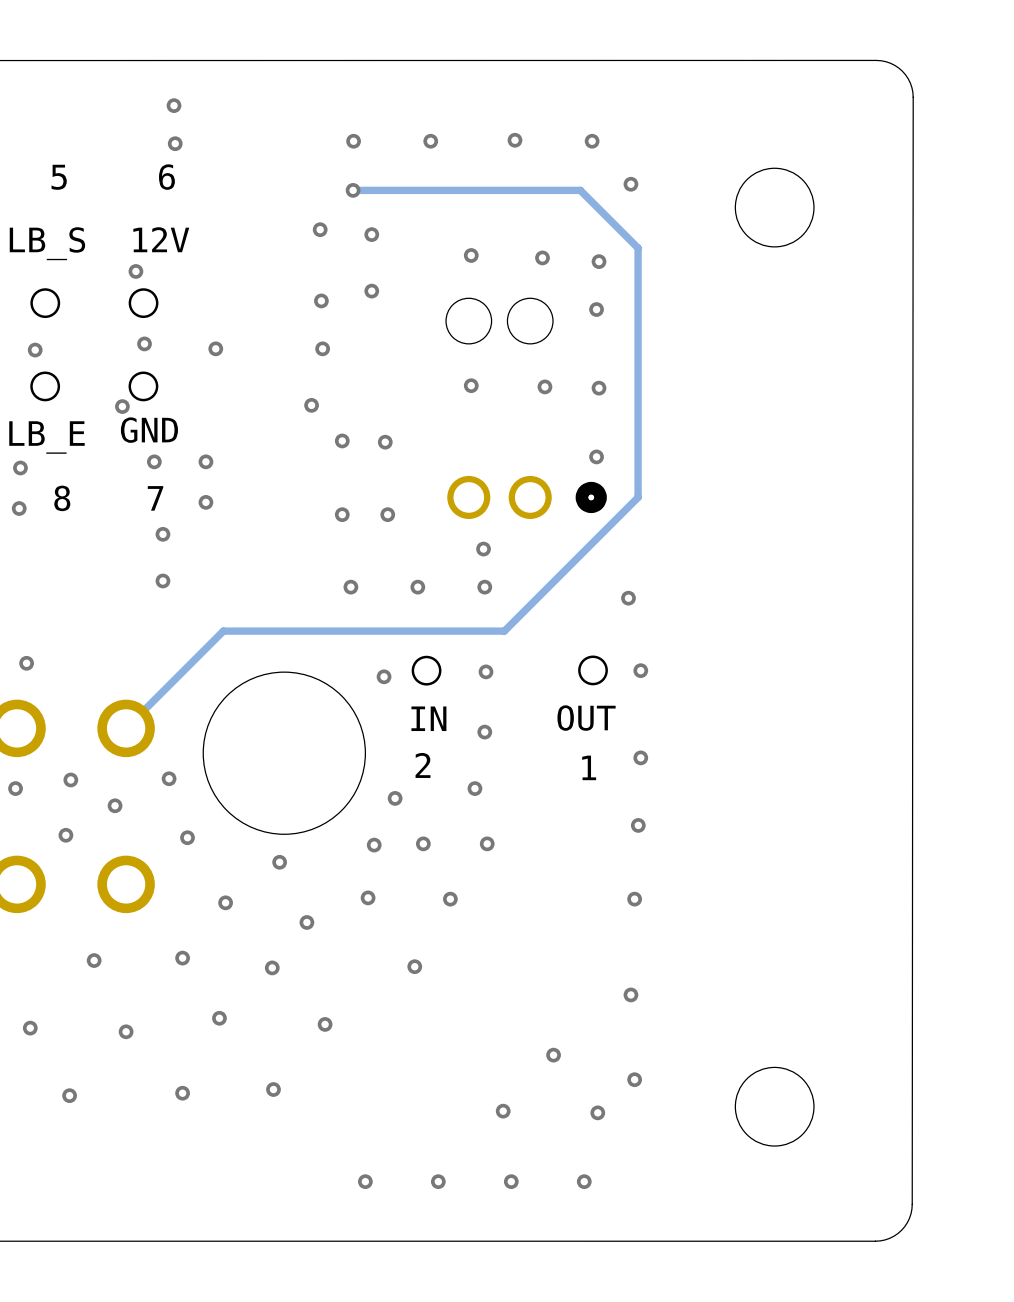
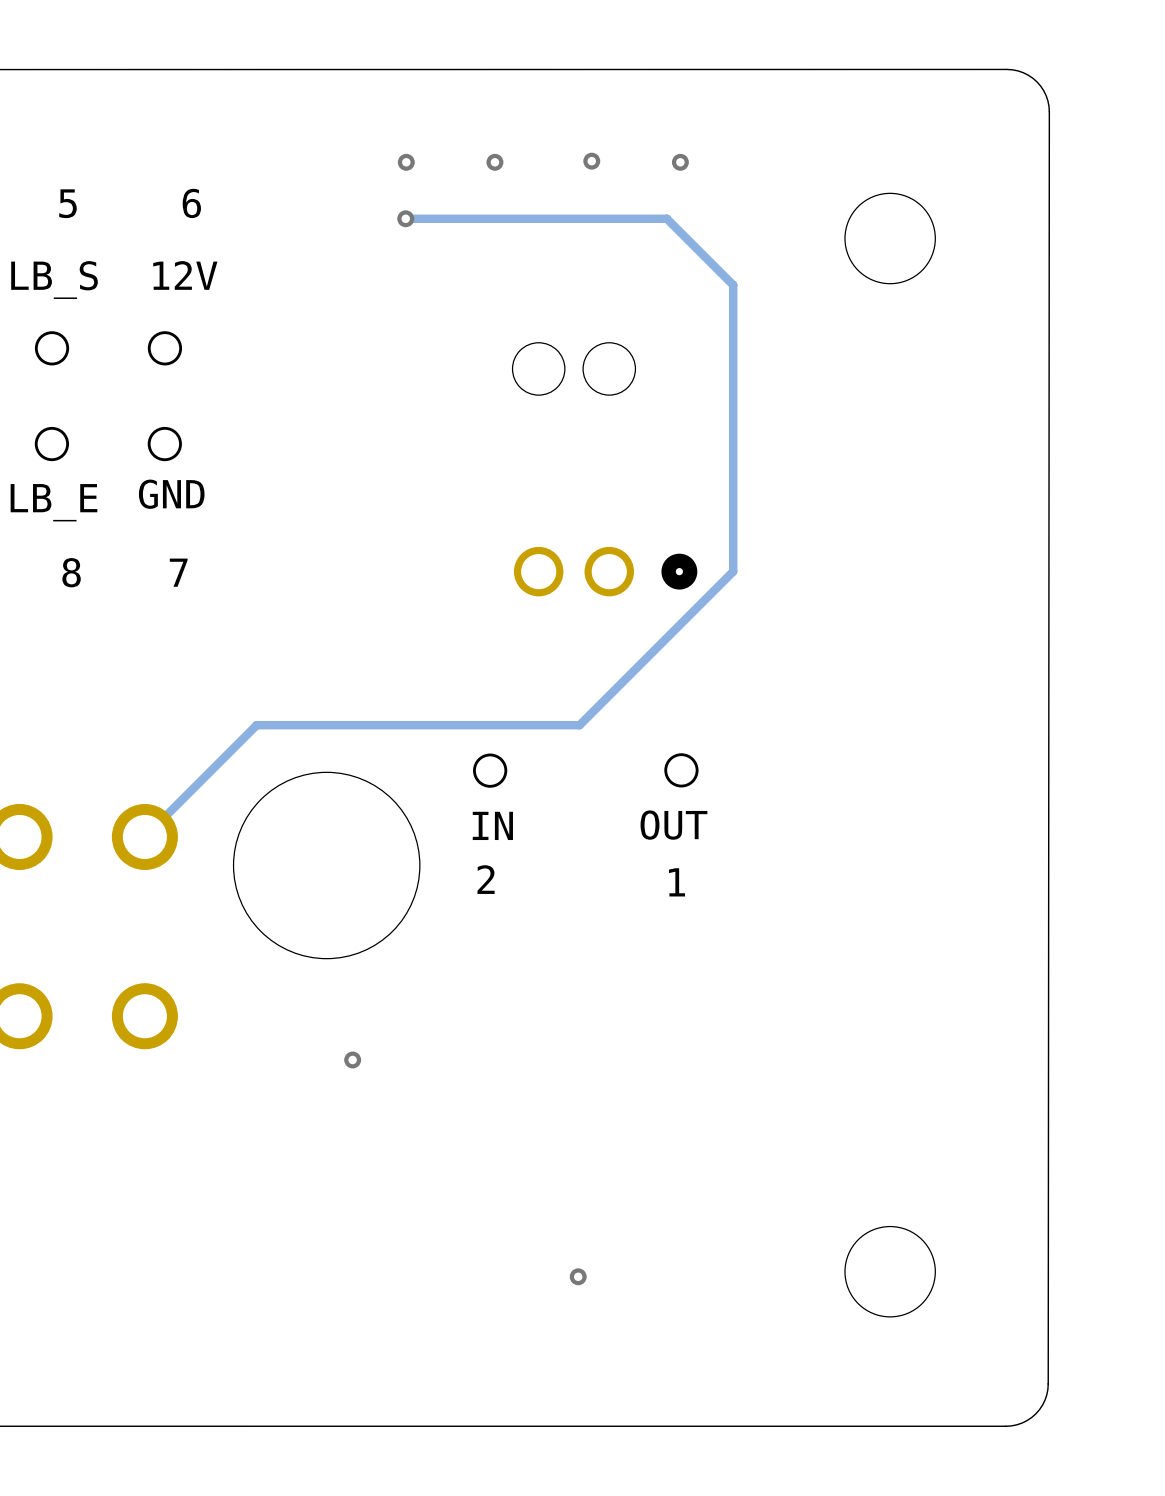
via: (174, 105) -> none
via: (175, 143) -> none
via: (630, 184) -> none
via: (320, 229) -> none
via: (371, 234) -> none
via: (471, 255) -> none
via: (542, 257) -> none
via: (599, 261) -> none
via: (135, 271) -> none
via: (371, 291) -> none
via: (321, 300) -> none
via: (596, 309) -> none
via: (144, 343) -> none
via: (215, 348) -> none
via: (322, 348) -> none
via: (35, 350) -> none
via: (471, 385) -> none
via: (544, 386) -> none
via: (599, 388) -> none
via: (311, 405) -> none
via: (122, 406) -> none
via: (342, 440) -> none
via: (385, 442) -> none
via: (596, 456) -> none
via: (154, 461) -> none
via: (205, 461) -> none
via: (20, 467) -> none
via: (205, 502) -> none
via: (19, 508) -> none
via: (342, 514) -> none
via: (387, 514) -> none
via: (162, 534) -> none
via: (483, 549) -> none
via: (162, 580) -> none
via: (350, 587) -> none
via: (417, 587) -> none
via: (484, 587) -> none
via: (628, 598) -> none
via: (26, 663) -> none
via: (640, 670) -> none
via: (486, 671) -> none
via: (384, 676) -> none
via: (484, 732) -> none
via: (640, 757) -> none
via: (169, 778) -> none
via: (70, 779) -> none
via: (15, 788) -> none
via: (474, 788) -> none
via: (395, 798) -> none
via: (115, 805) -> none
via: (638, 825) -> none
via: (65, 835) -> none
via: (187, 837) -> none
via: (423, 843) -> none
via: (487, 843) -> none
via: (374, 845) -> none
via: (279, 862) -> none
via: (368, 897) -> none
via: (450, 899) -> none
via: (634, 899) -> none
via: (225, 902) -> none
via: (182, 958) -> none
via: (94, 960) -> none
via: (414, 966) -> none
via: (272, 967) -> none
via: (630, 994) -> none
via: (219, 1018) -> none
via: (325, 1024) -> none
via: (30, 1028) -> none
via: (126, 1031) -> none
via: (553, 1055) -> none
via: (634, 1079) -> none
via: (273, 1089) -> none
via: (182, 1093) -> none
via: (69, 1095) -> none
via: (597, 1112) -> none
via: (365, 1181) -> none
via: (438, 1181) -> none
via: (511, 1181) -> none
via: (584, 1181) -> none

